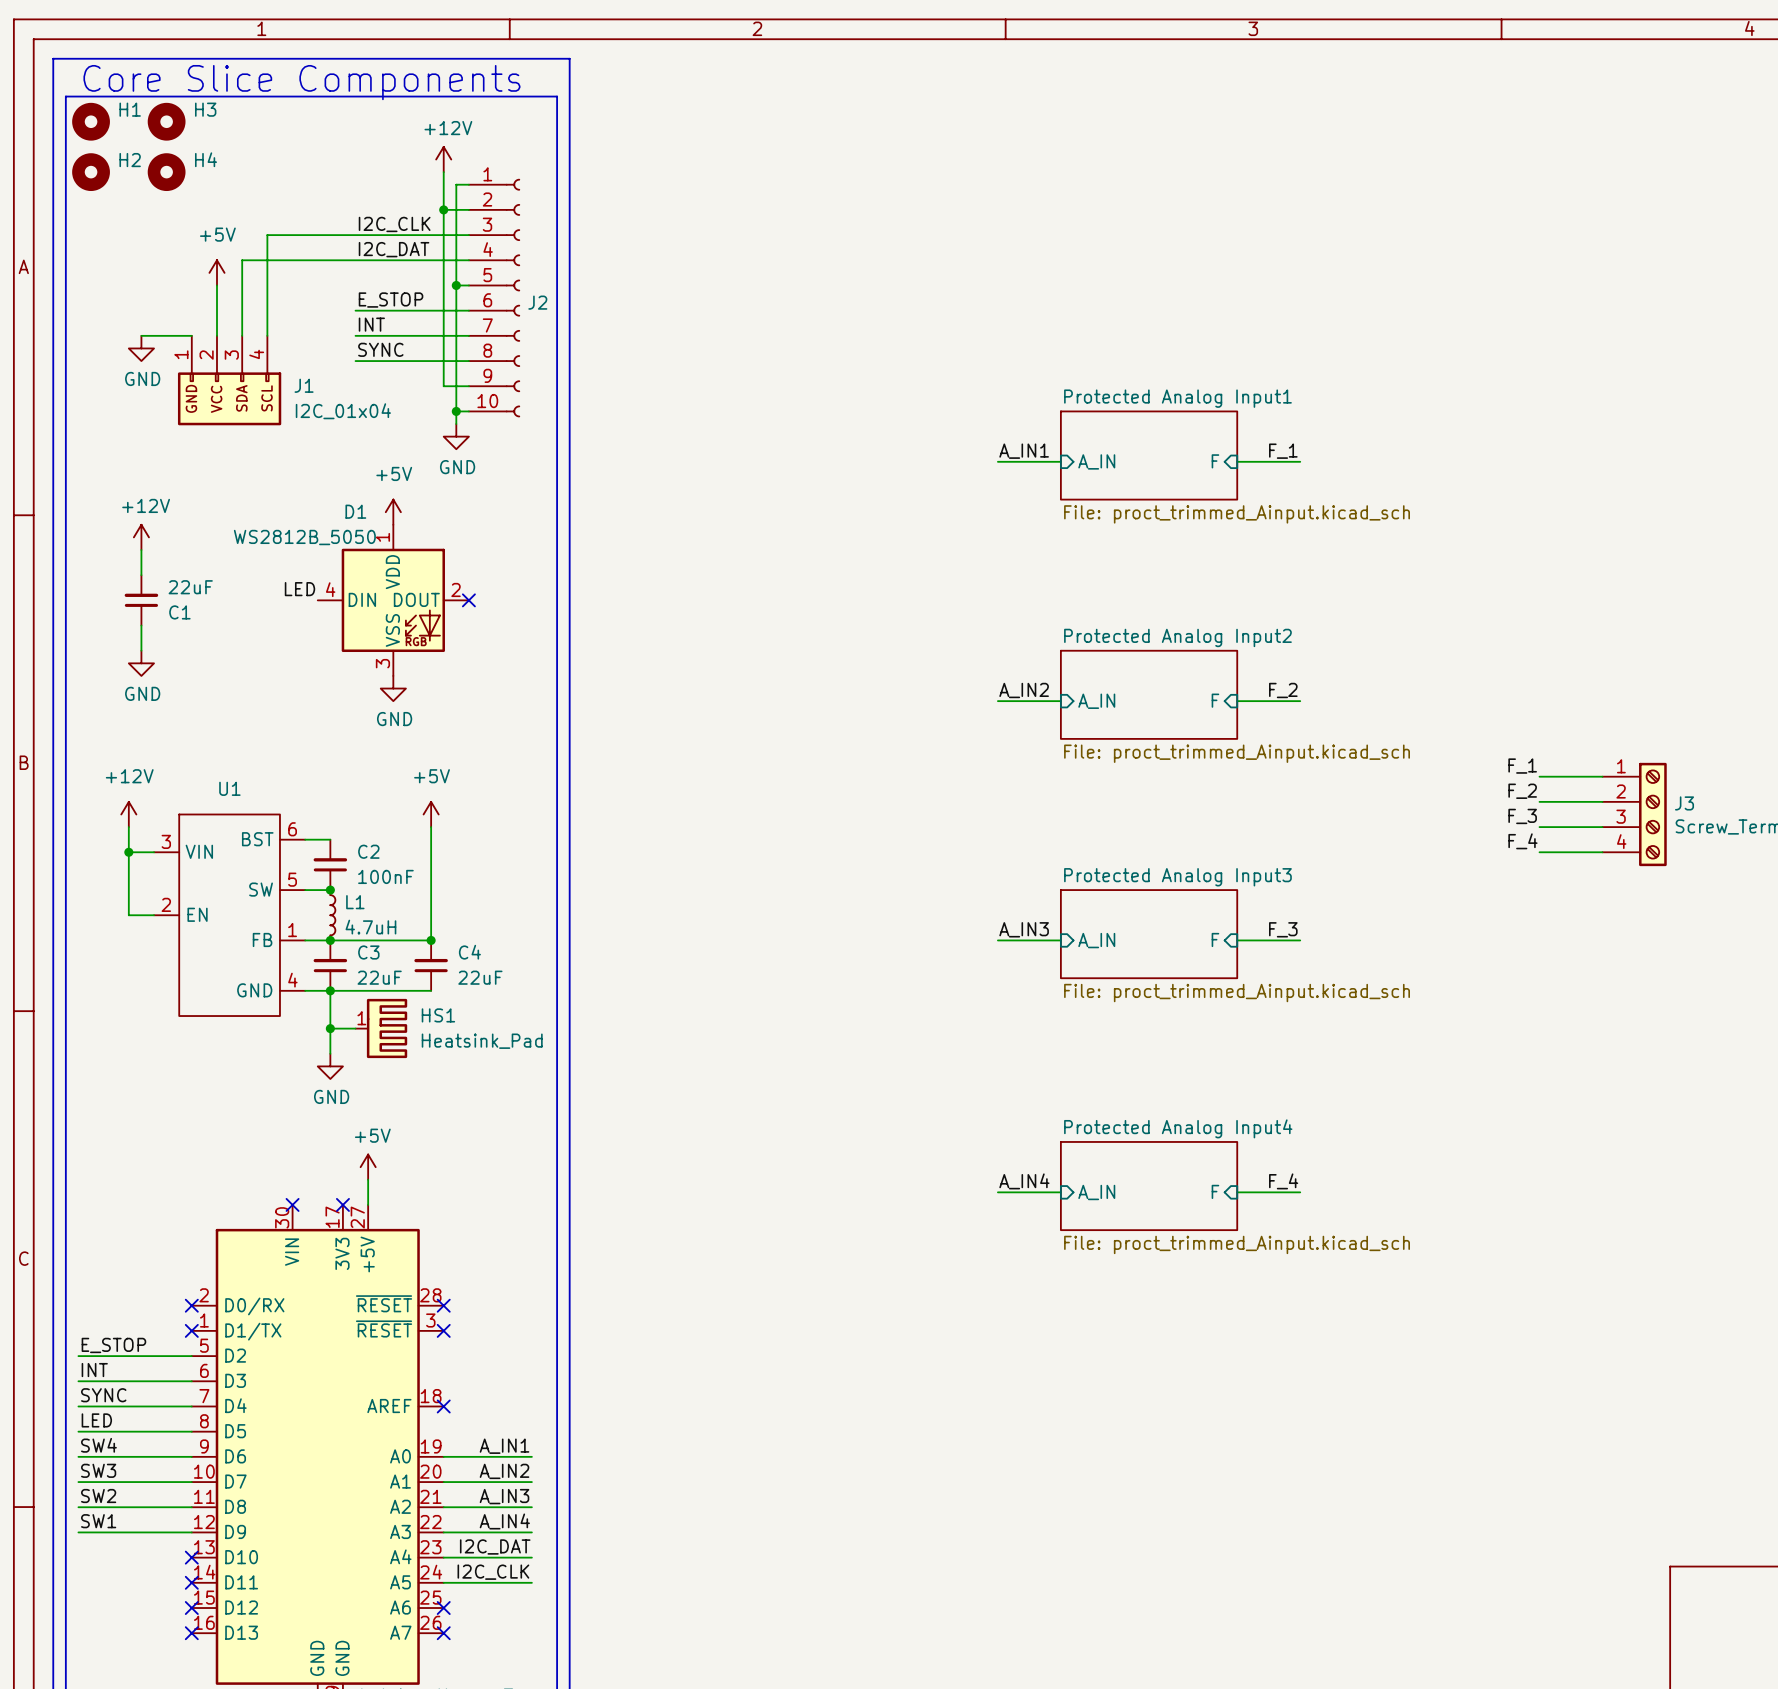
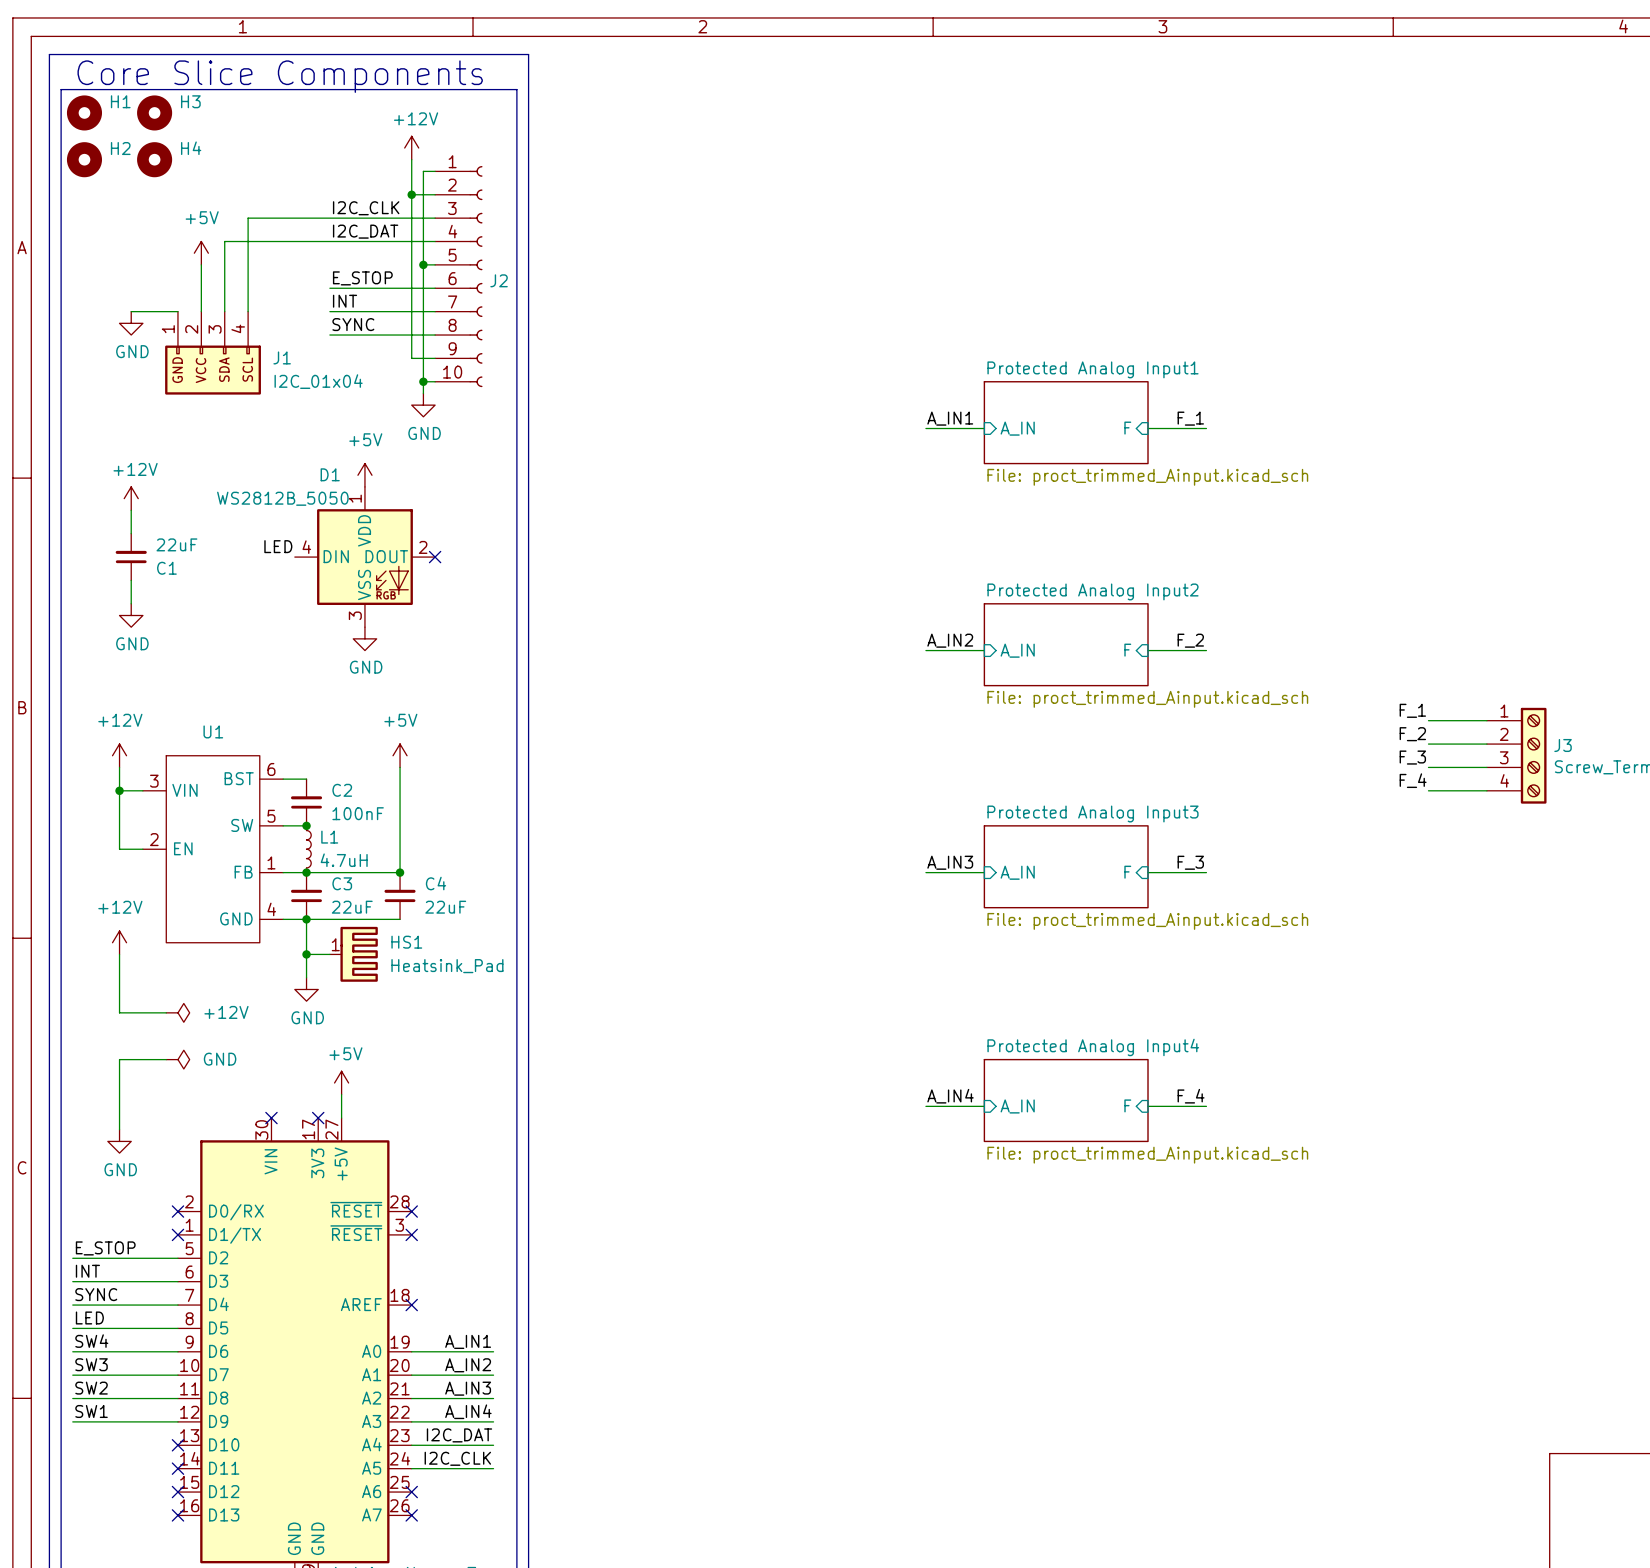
power symbol: none -> +12V (119, 942)
wire: none -> (119, 954) (119, 1012) (166, 1012)
power symbol: none -> +12V (177, 1012)
wire: none -> (166, 1059) (119, 1059) (119, 1129)
power symbol: none -> GND (177, 1059)
power symbol: none -> GND (119, 1141)

